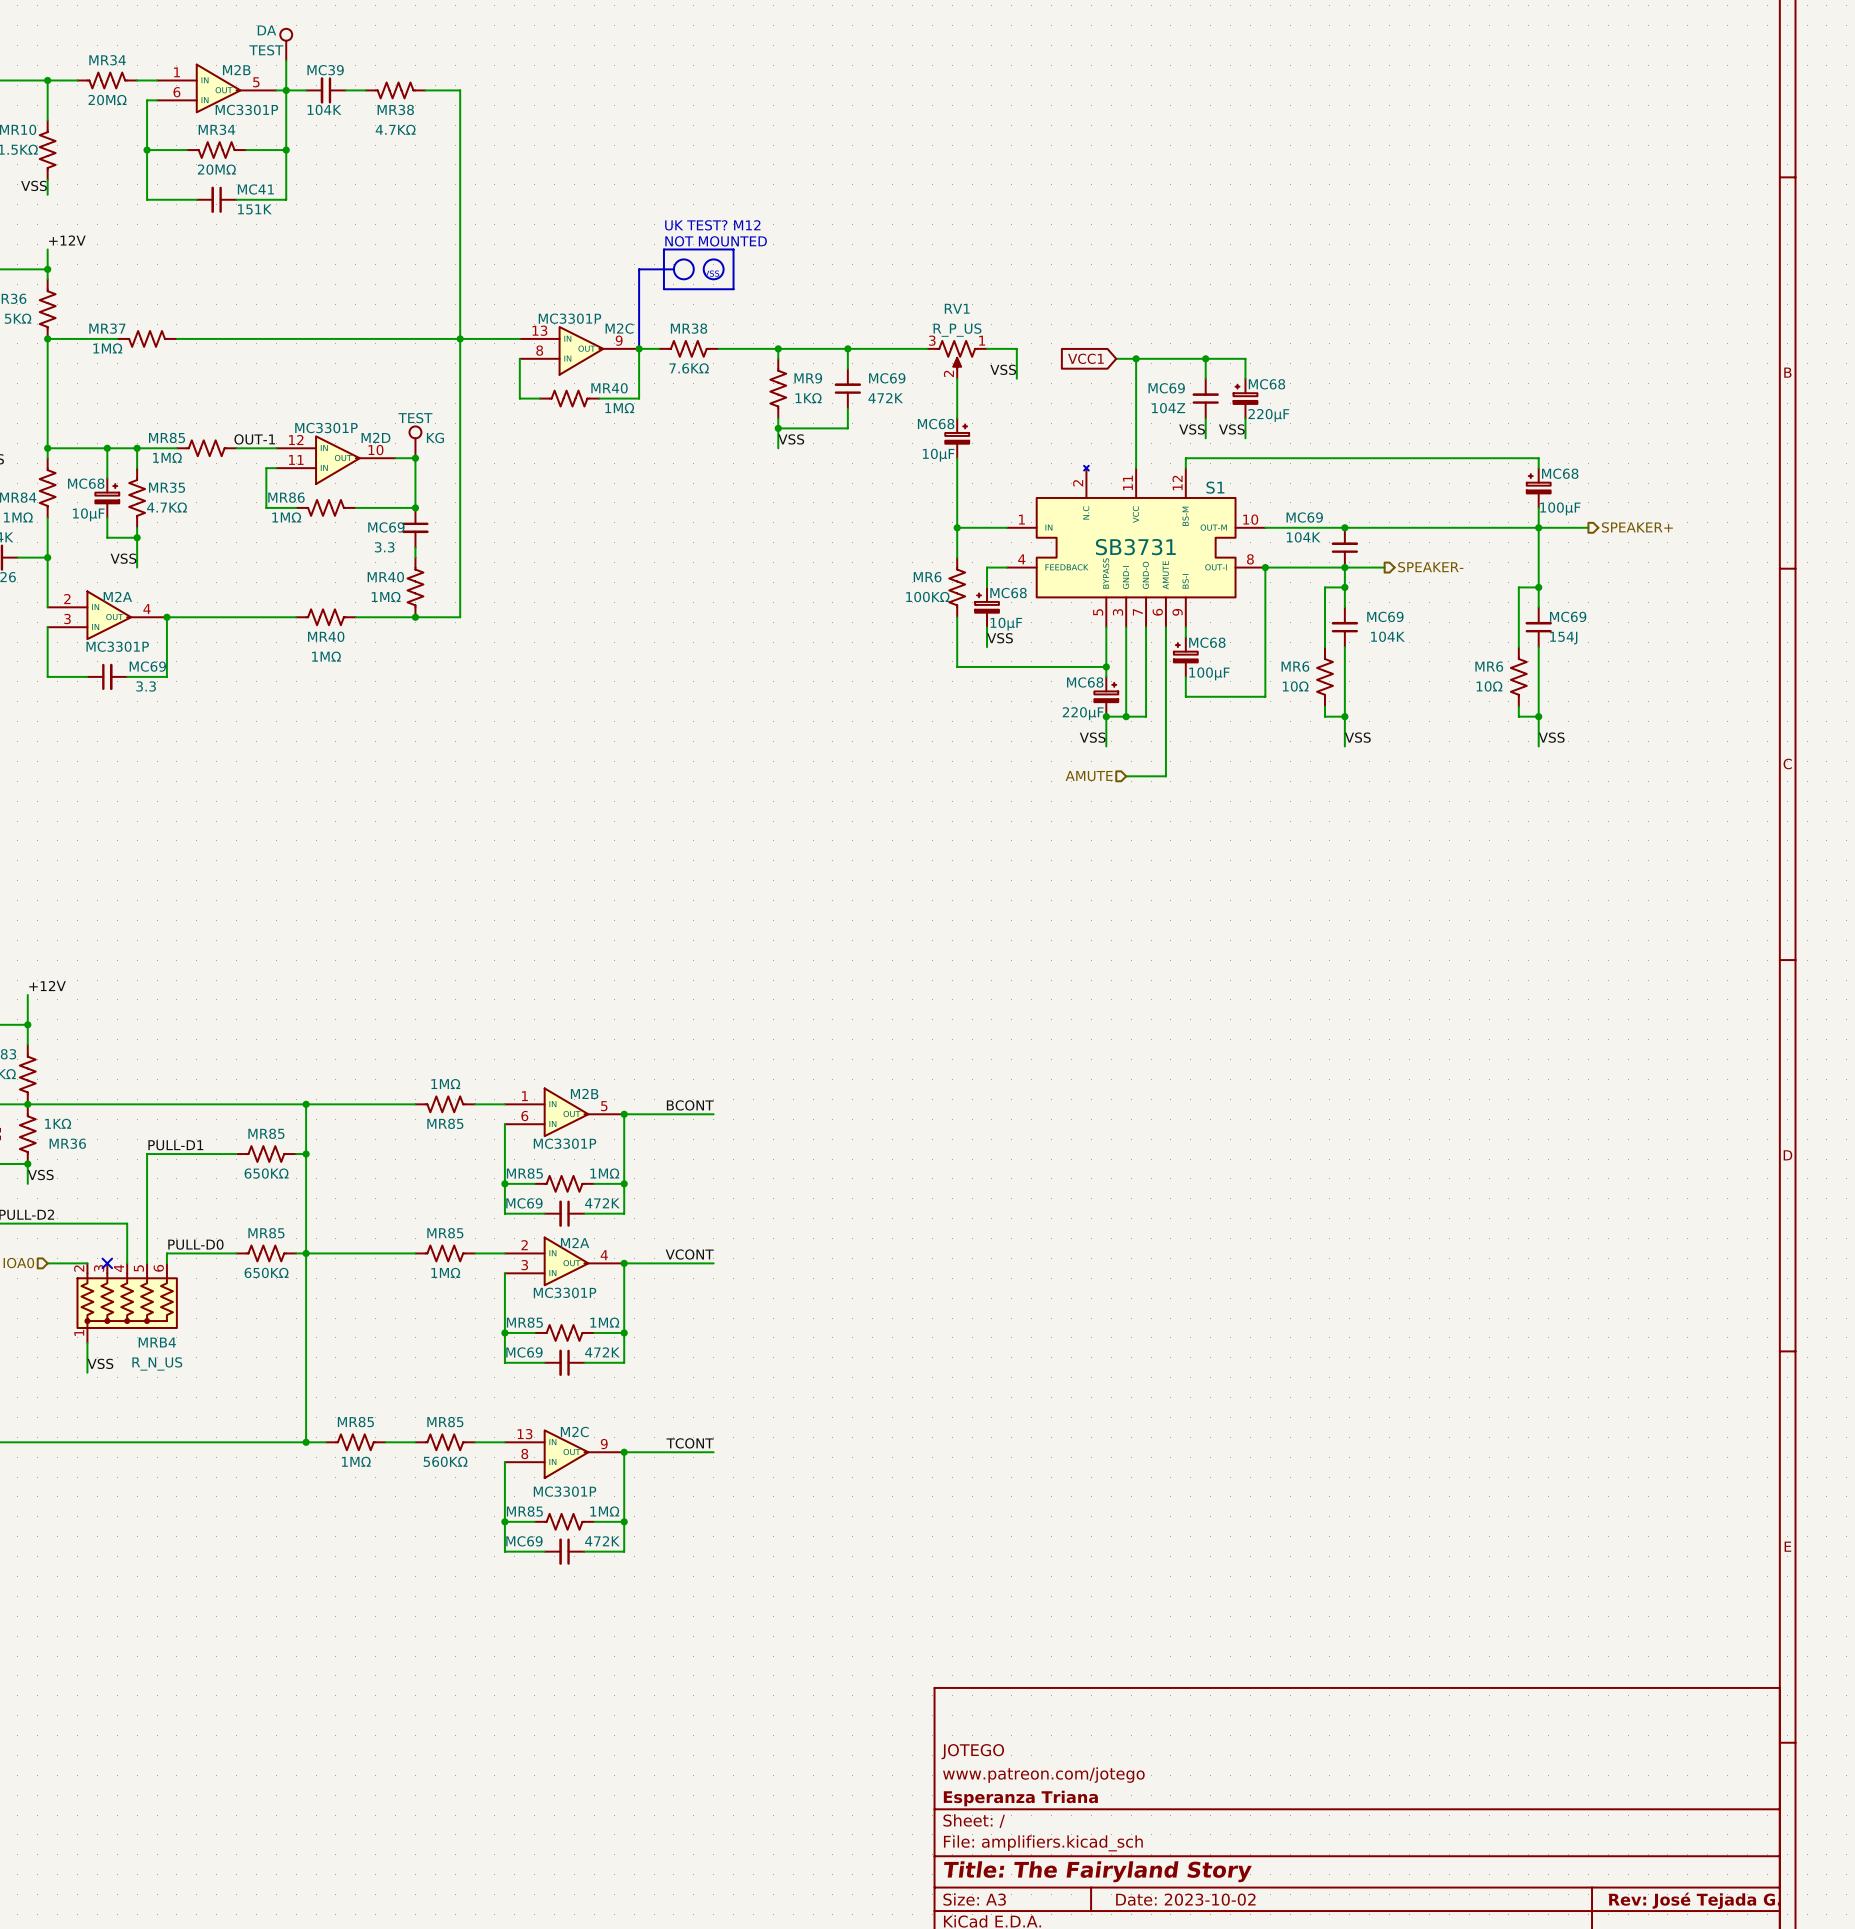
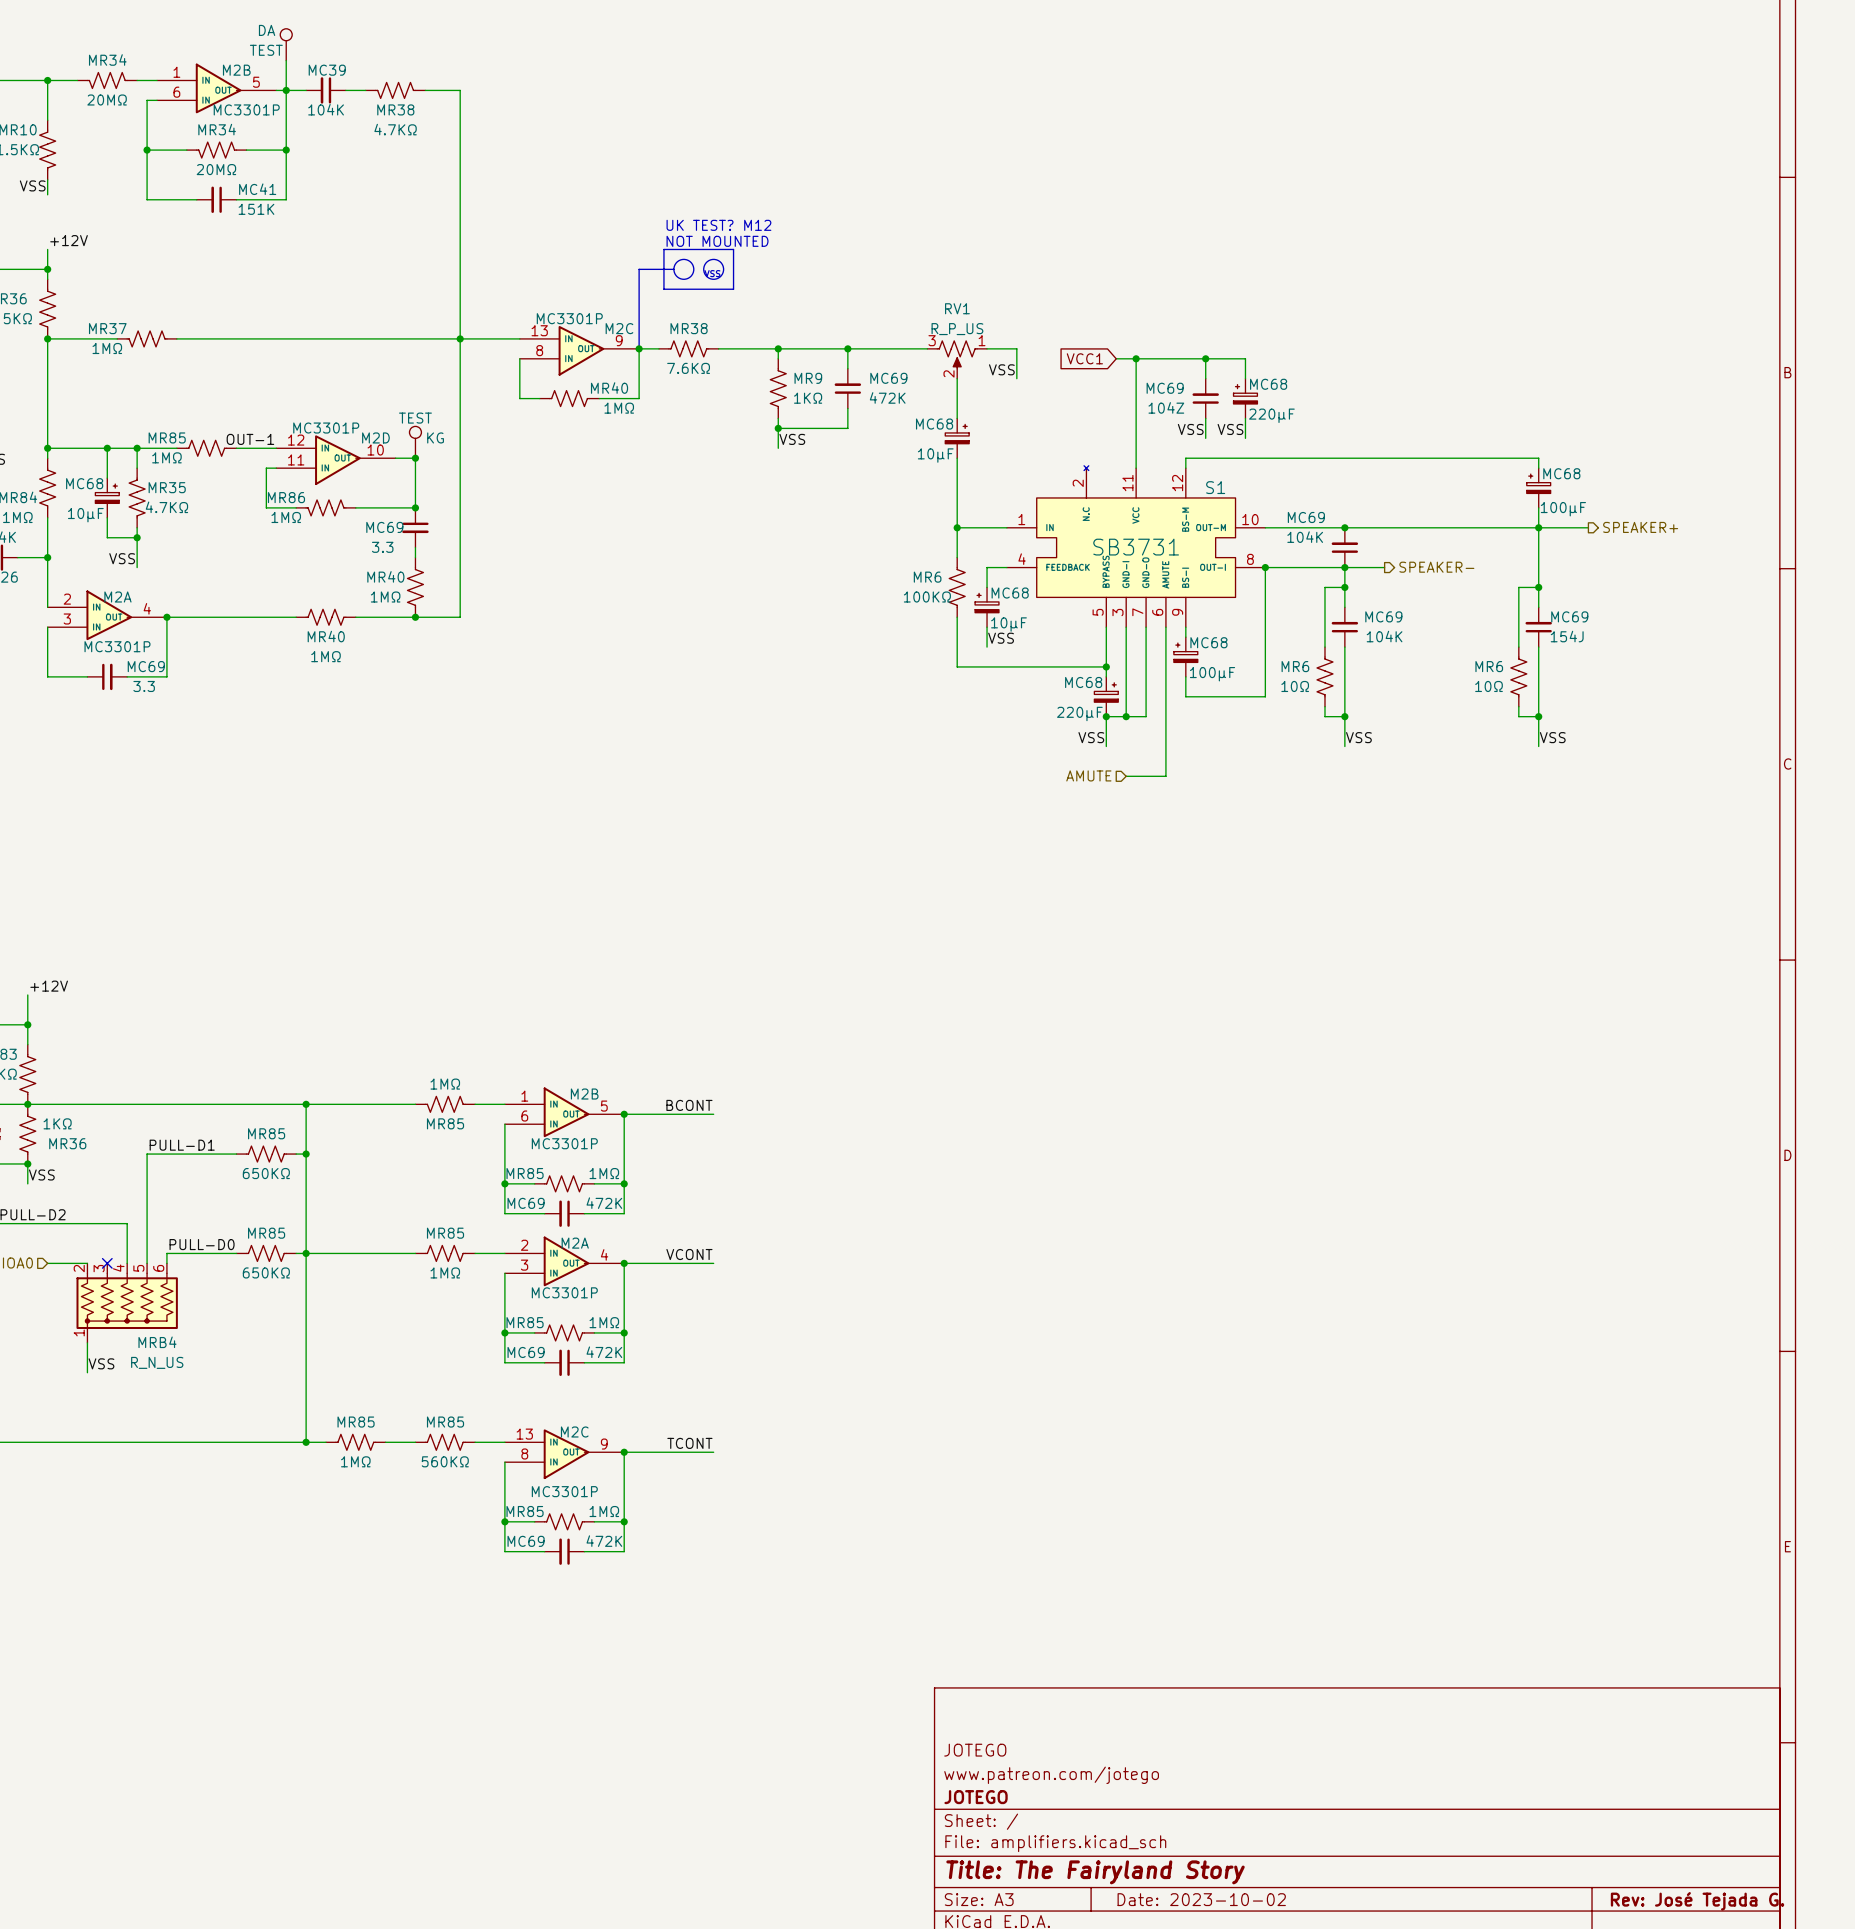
title block: Esperanza Triana (1020, 1798) -> JOTEGO (976, 1797)

